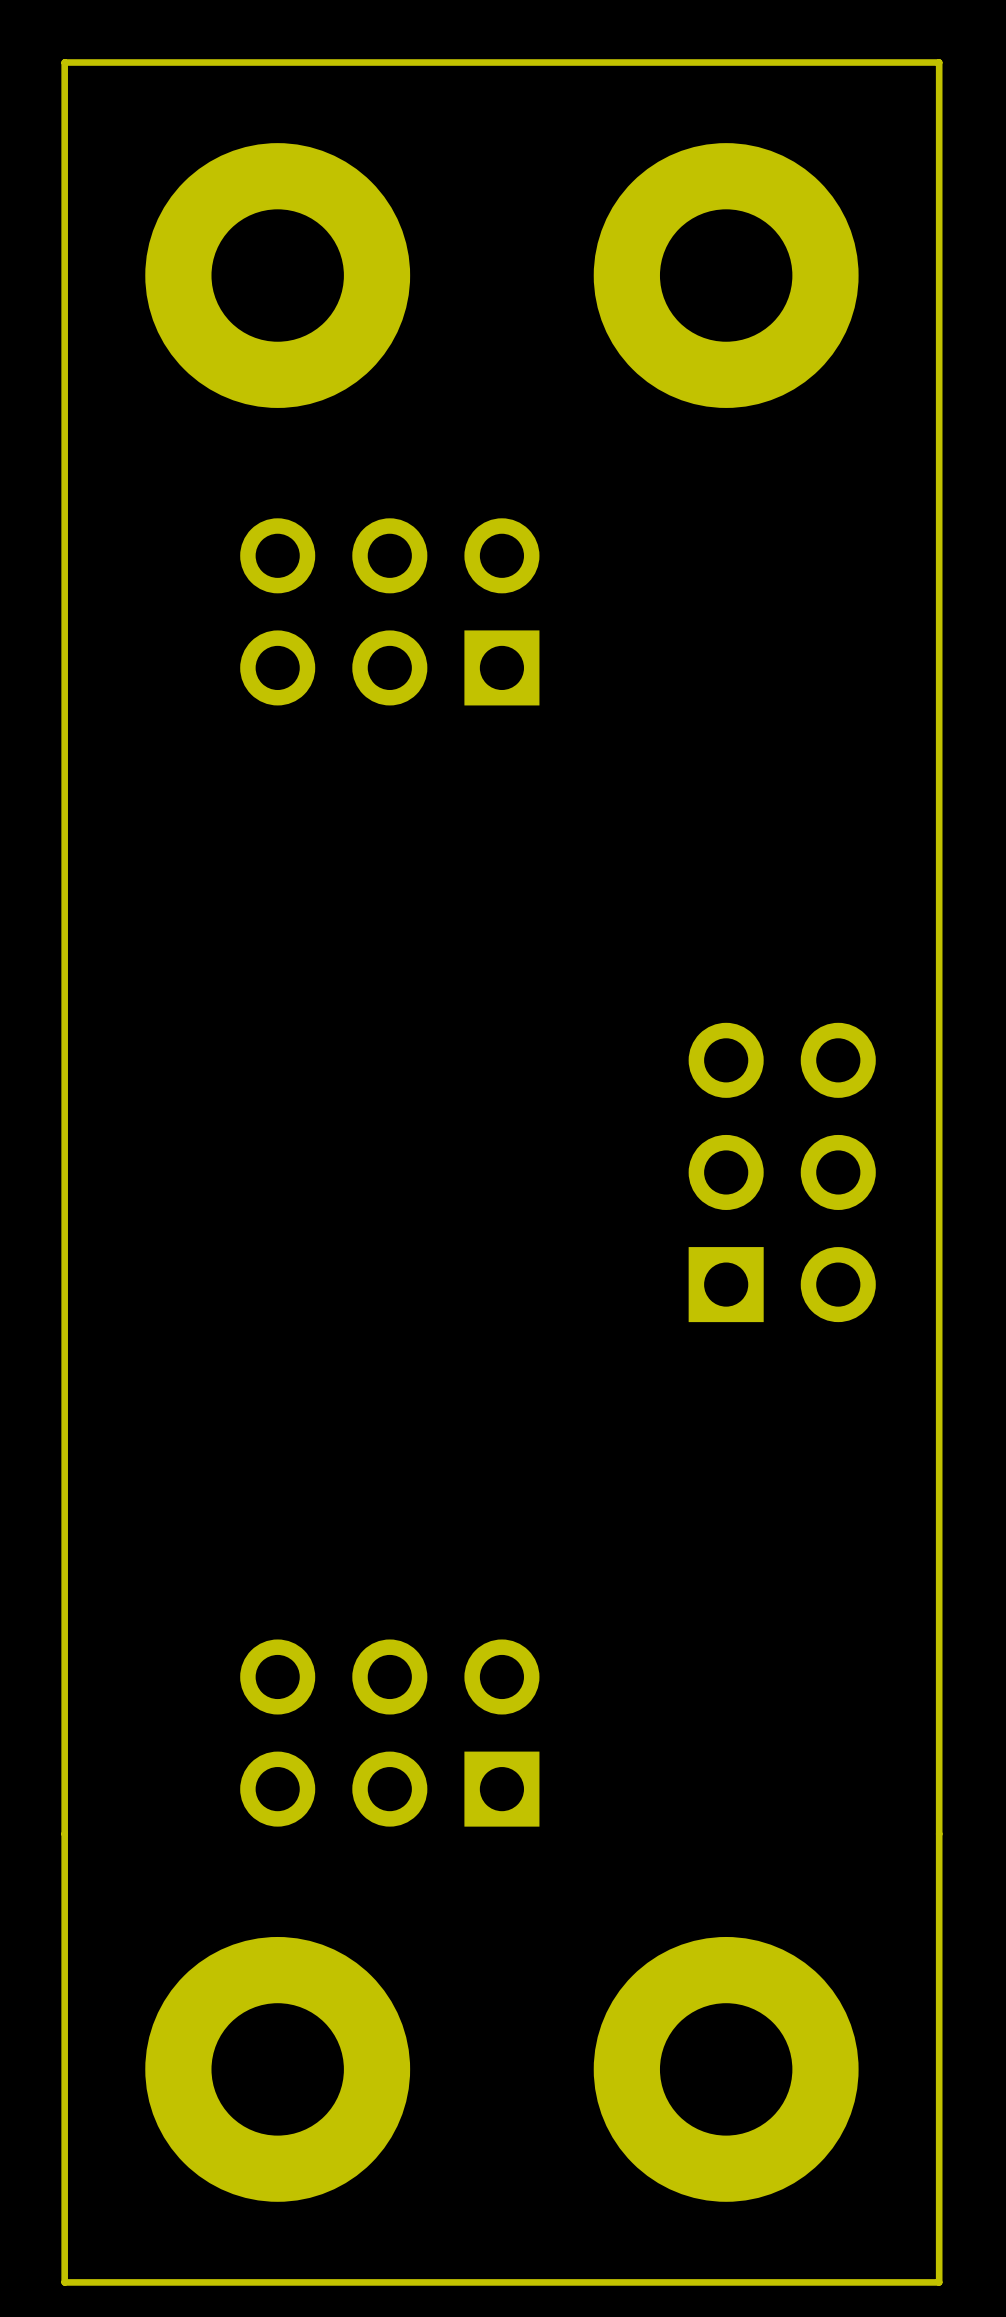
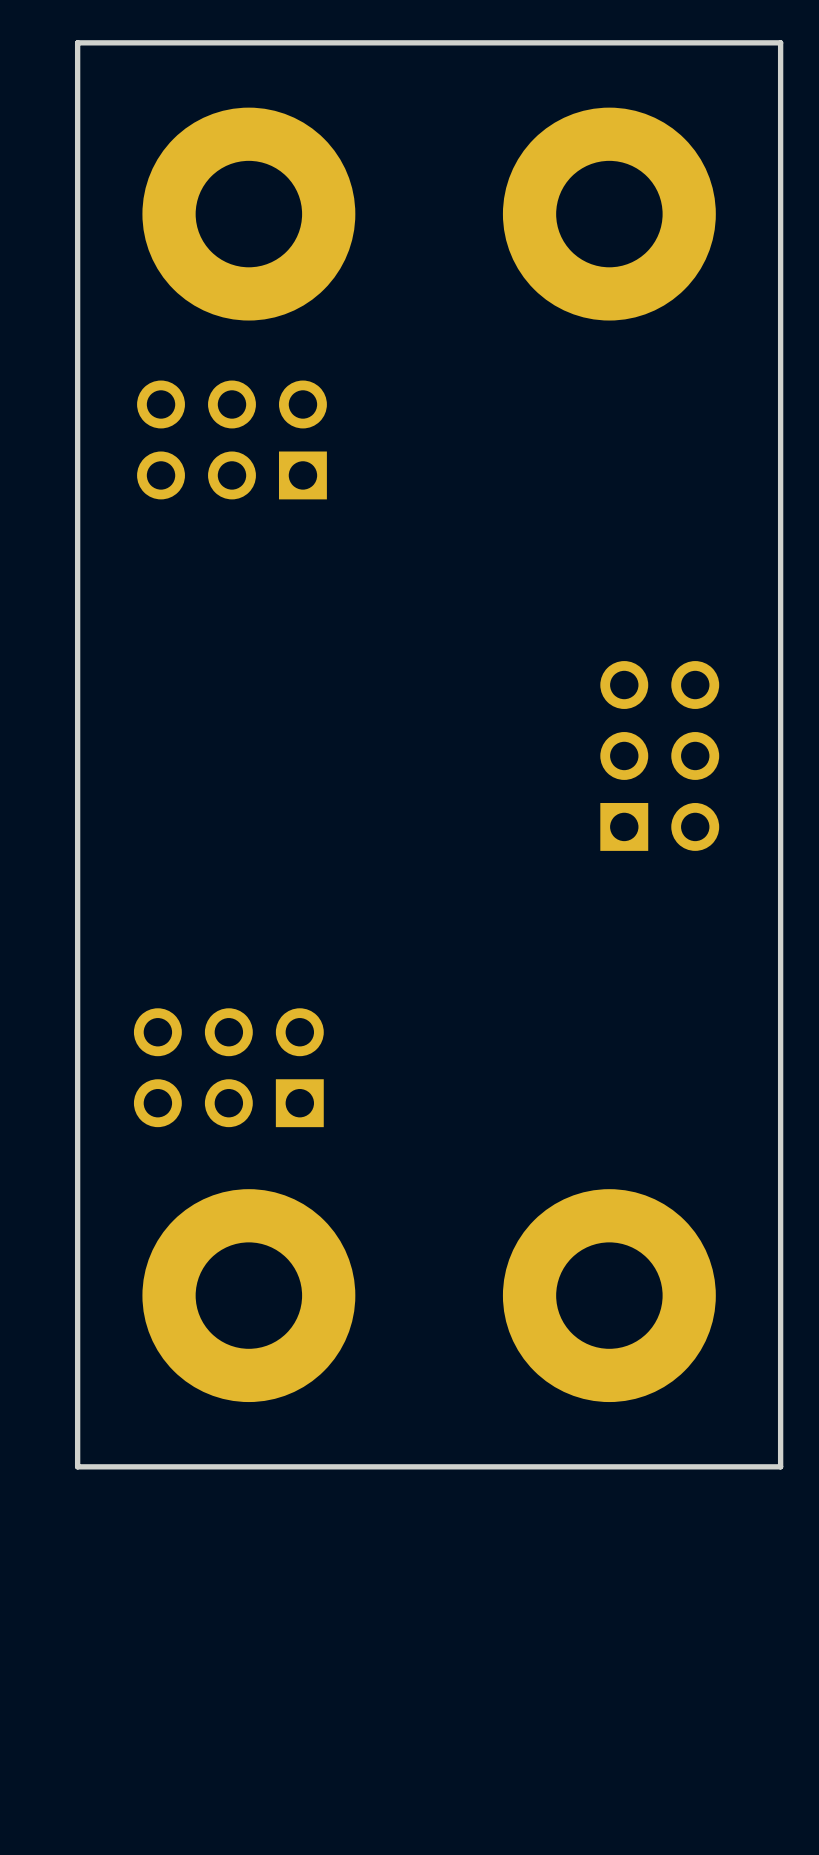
part: none -> (231, 439)
part: (389, 611) -> none
part: none -> (659, 755)
part: (782, 1172) -> none
part: none -> (228, 1067)
part: none -> (248, 1295)
part: none -> (609, 1295)
part: (389, 1733) -> none
board edge: (939, 1833) (939, 2282) (64, 2282) (64, 1833) -> (780, 1466) (77, 1466)
part: (277, 2069) -> none
part: (726, 2069) -> none

